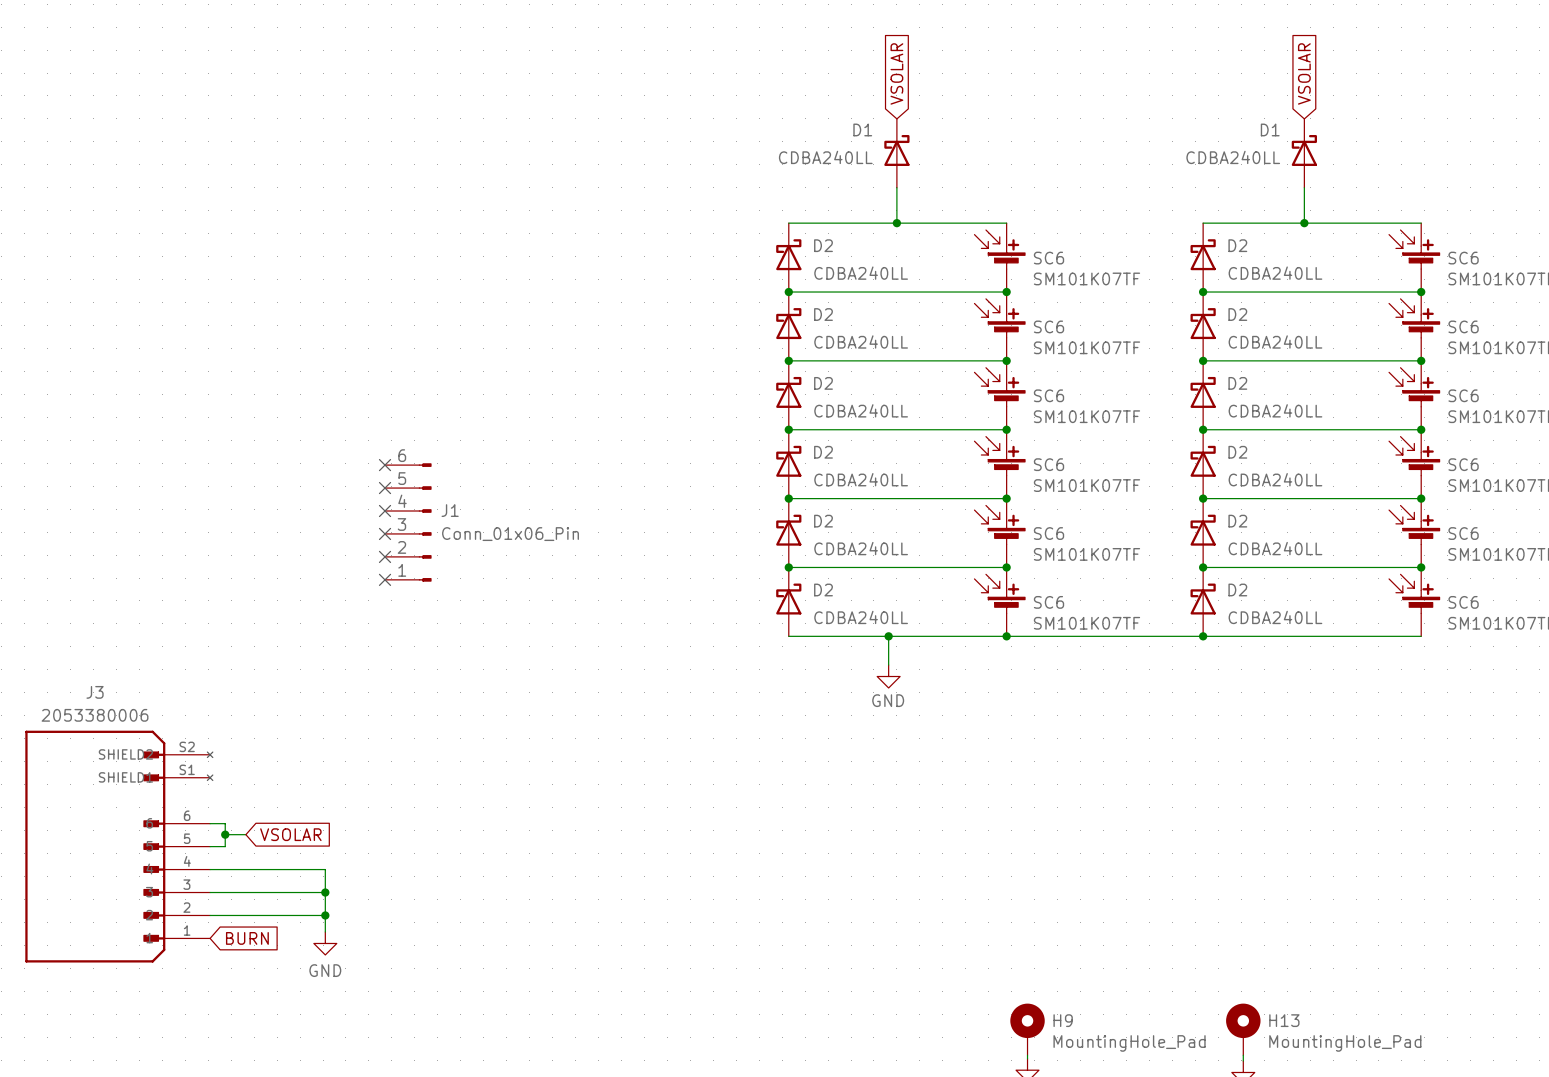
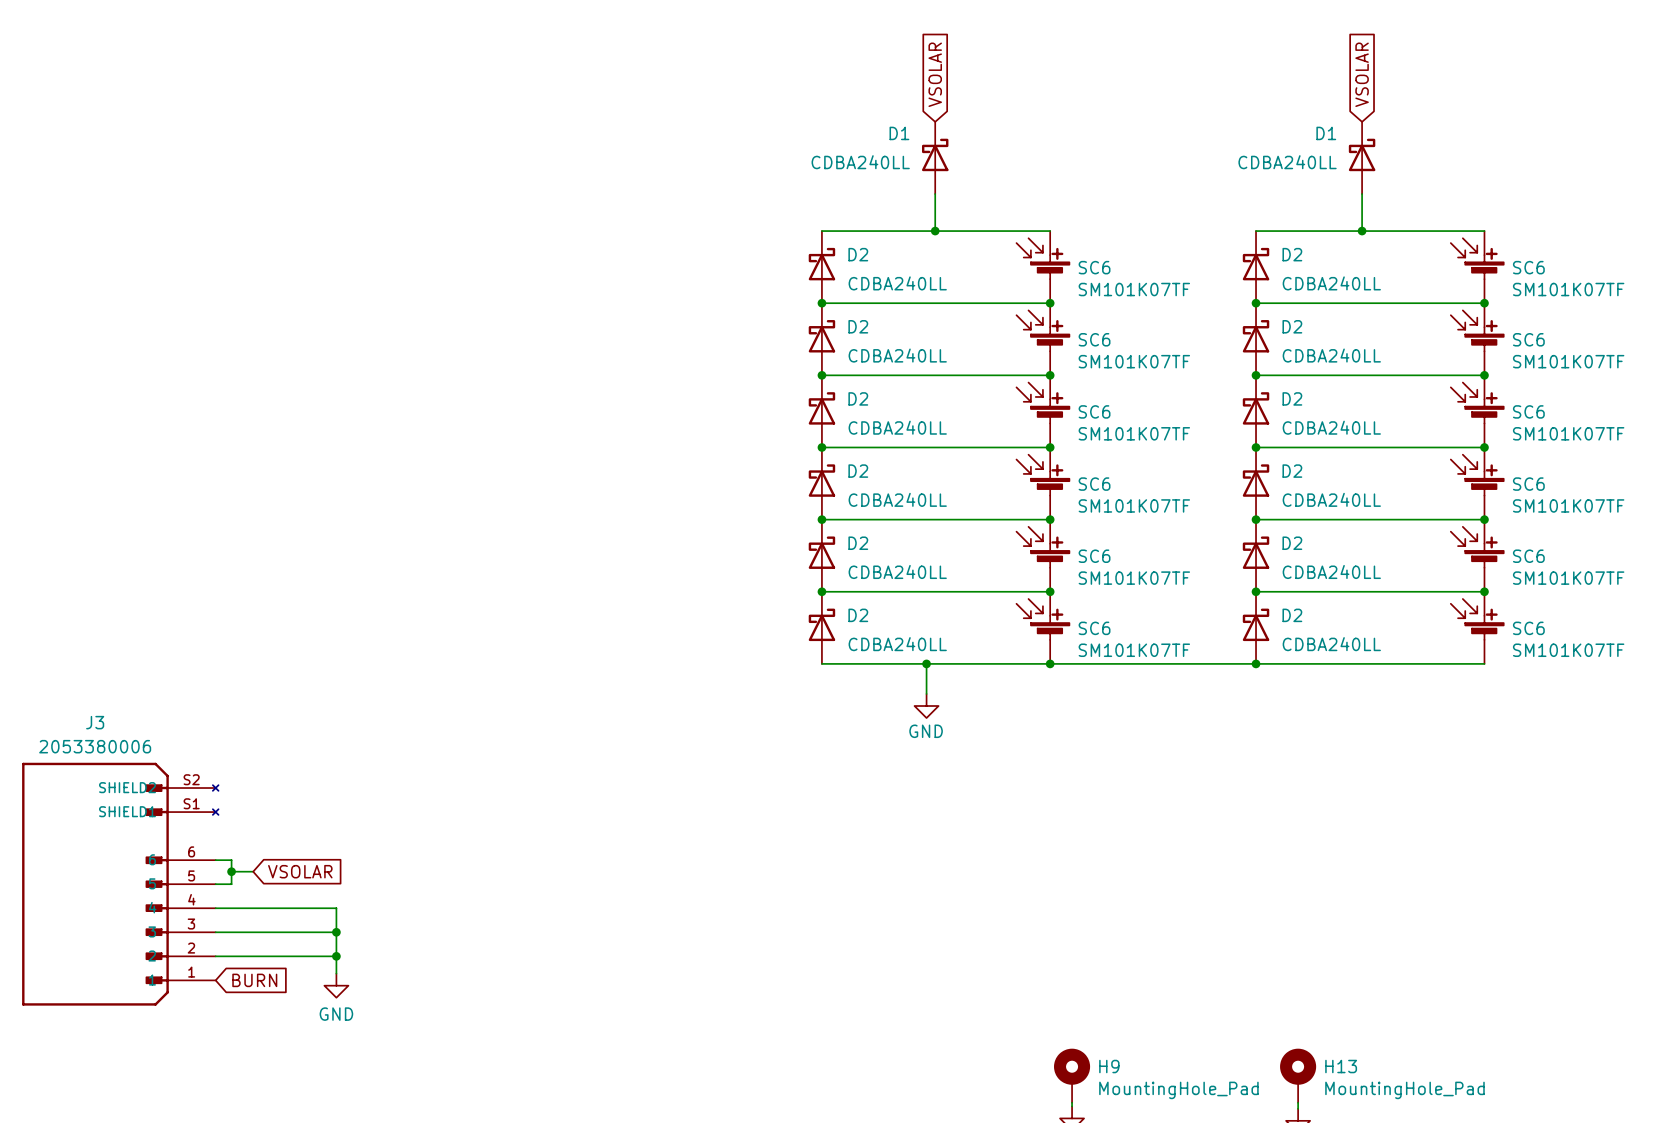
no-connect mark: (385, 465) -> none
no-connect mark: (385, 488) -> none
no-connect mark: (385, 511) -> none
J1: Conn_01x06_Pin (408, 522) -> none
no-connect mark: (385, 533) -> none
no-connect mark: (385, 556) -> none
no-connect mark: (385, 579) -> none

